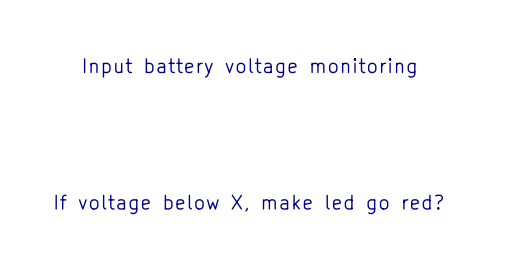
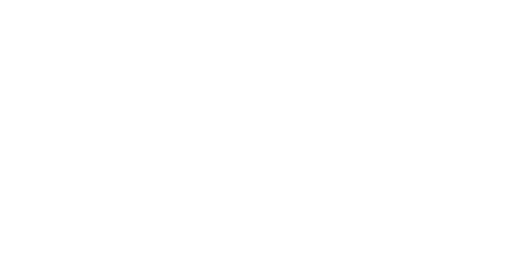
text: Input battery voltage monitoring (249, 67) -> none
text: If voltage below X, make led go red? (249, 204) -> none

